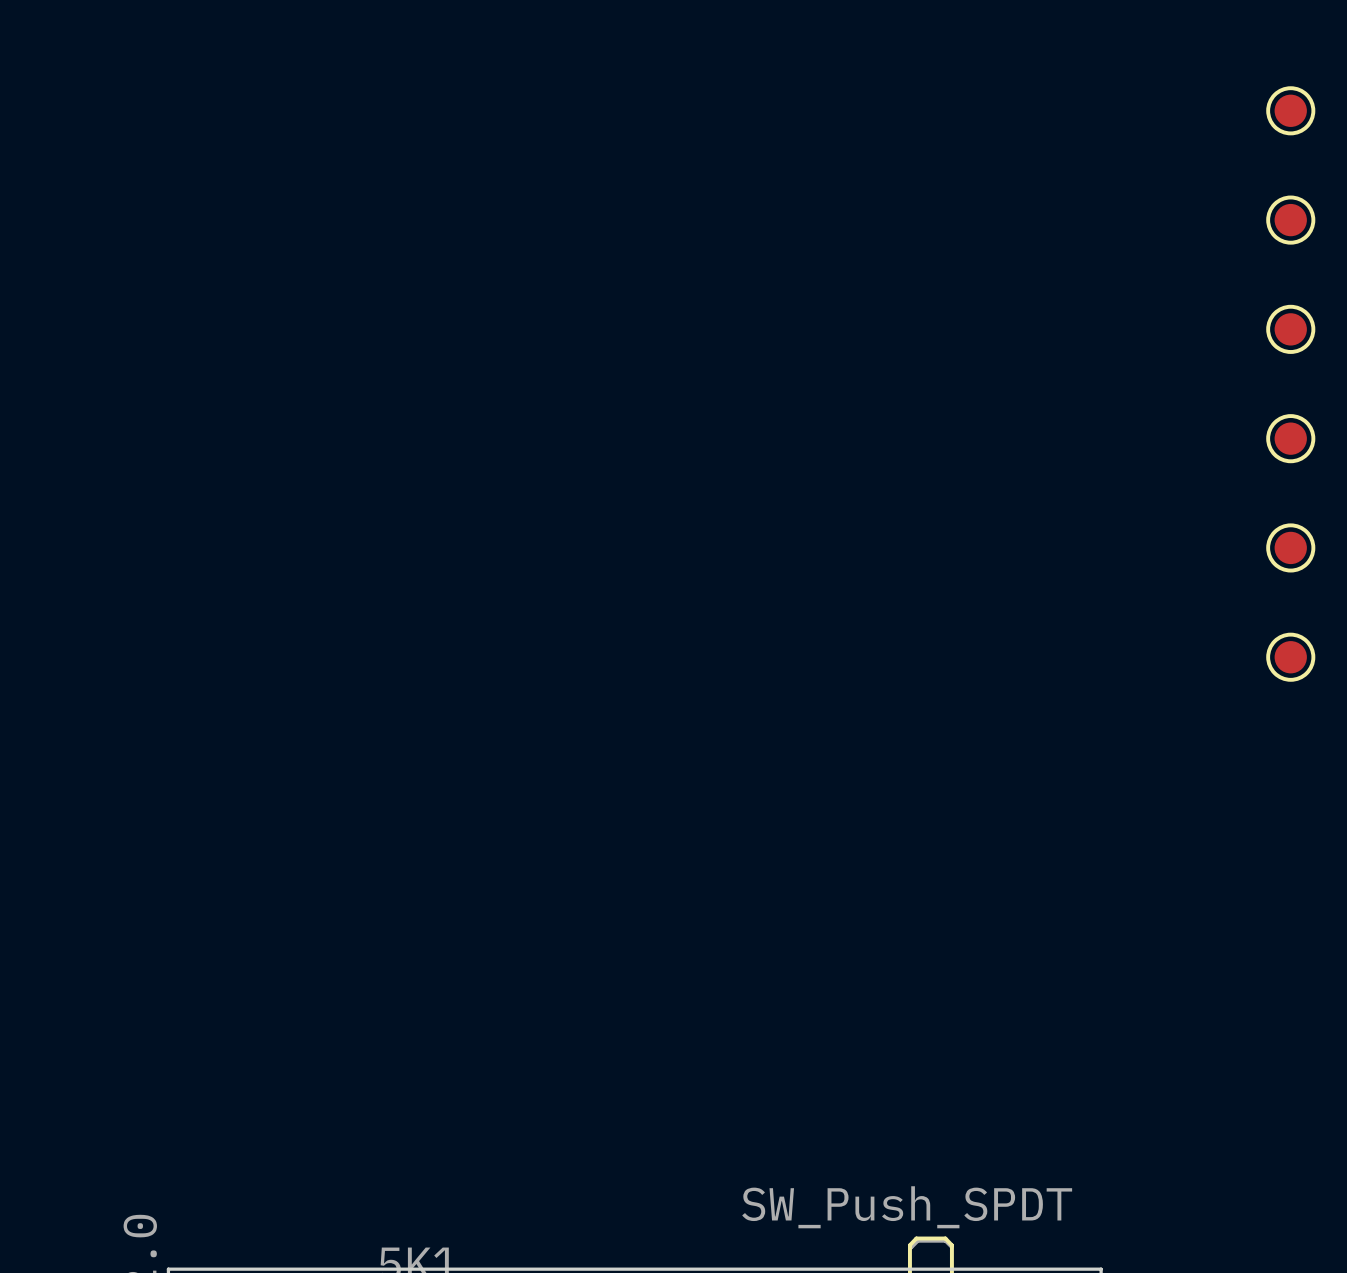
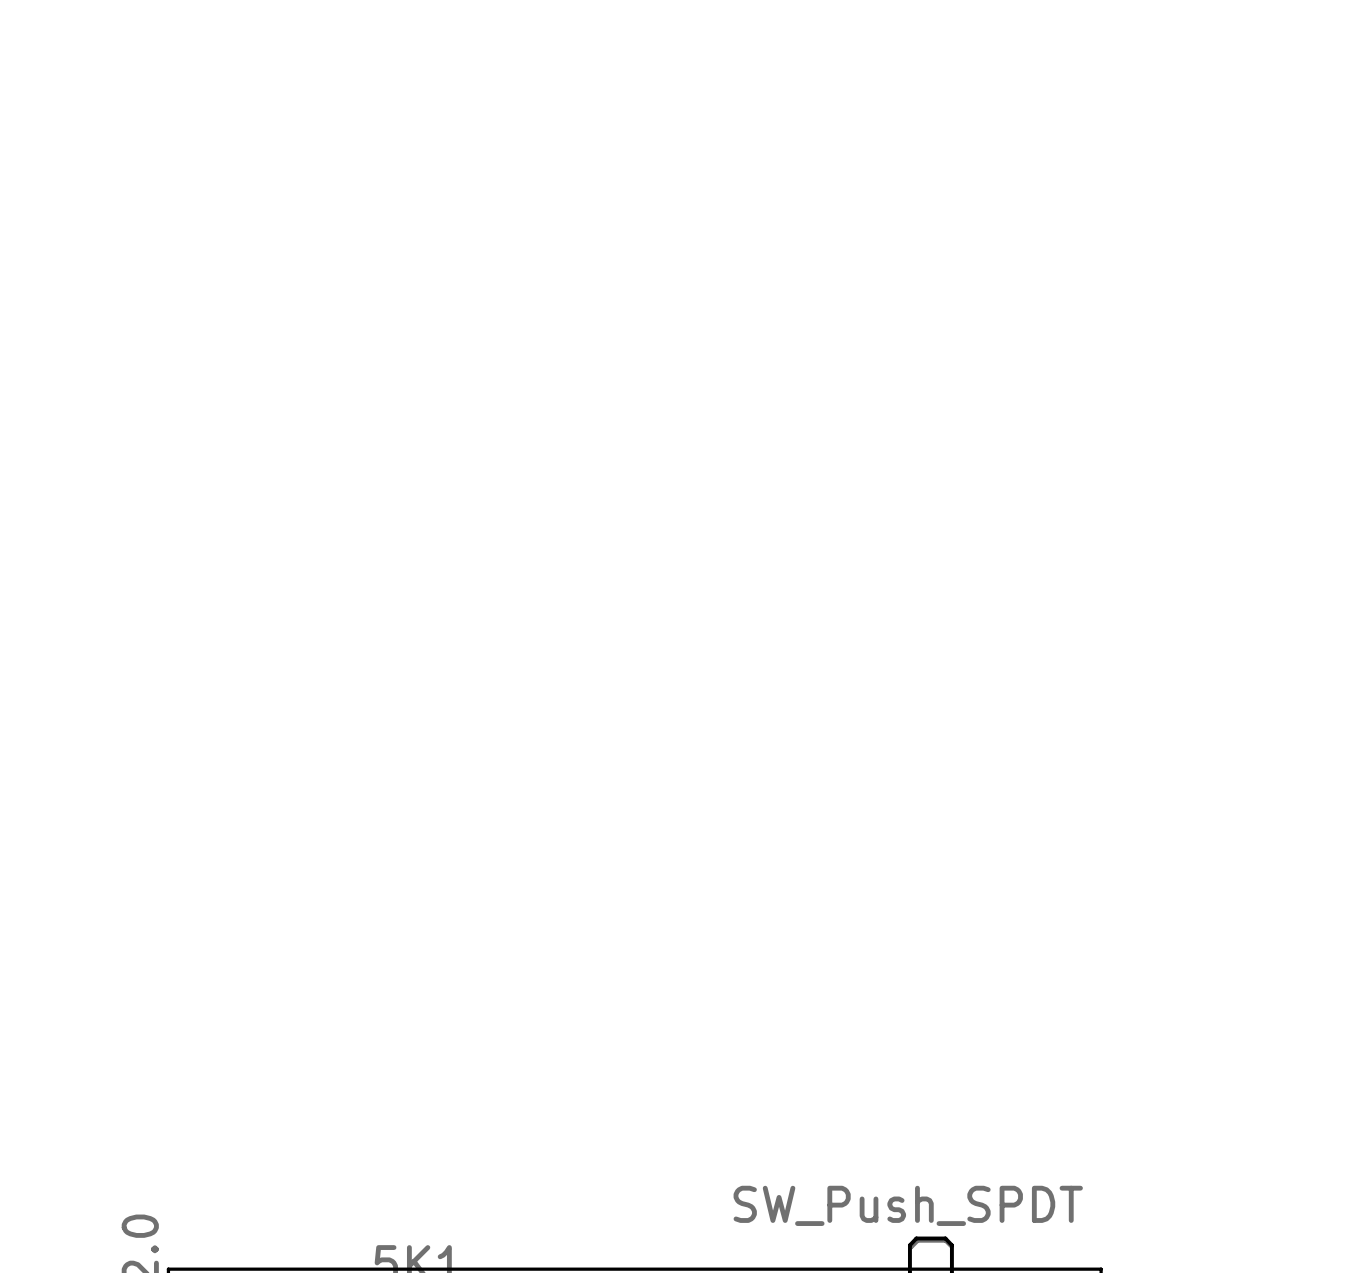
part: (1290, 110) -> none
part: (1290, 220) -> none
part: (1290, 329) -> none
part: (1290, 438) -> none
part: (1290, 547) -> none
part: (1290, 657) -> none

